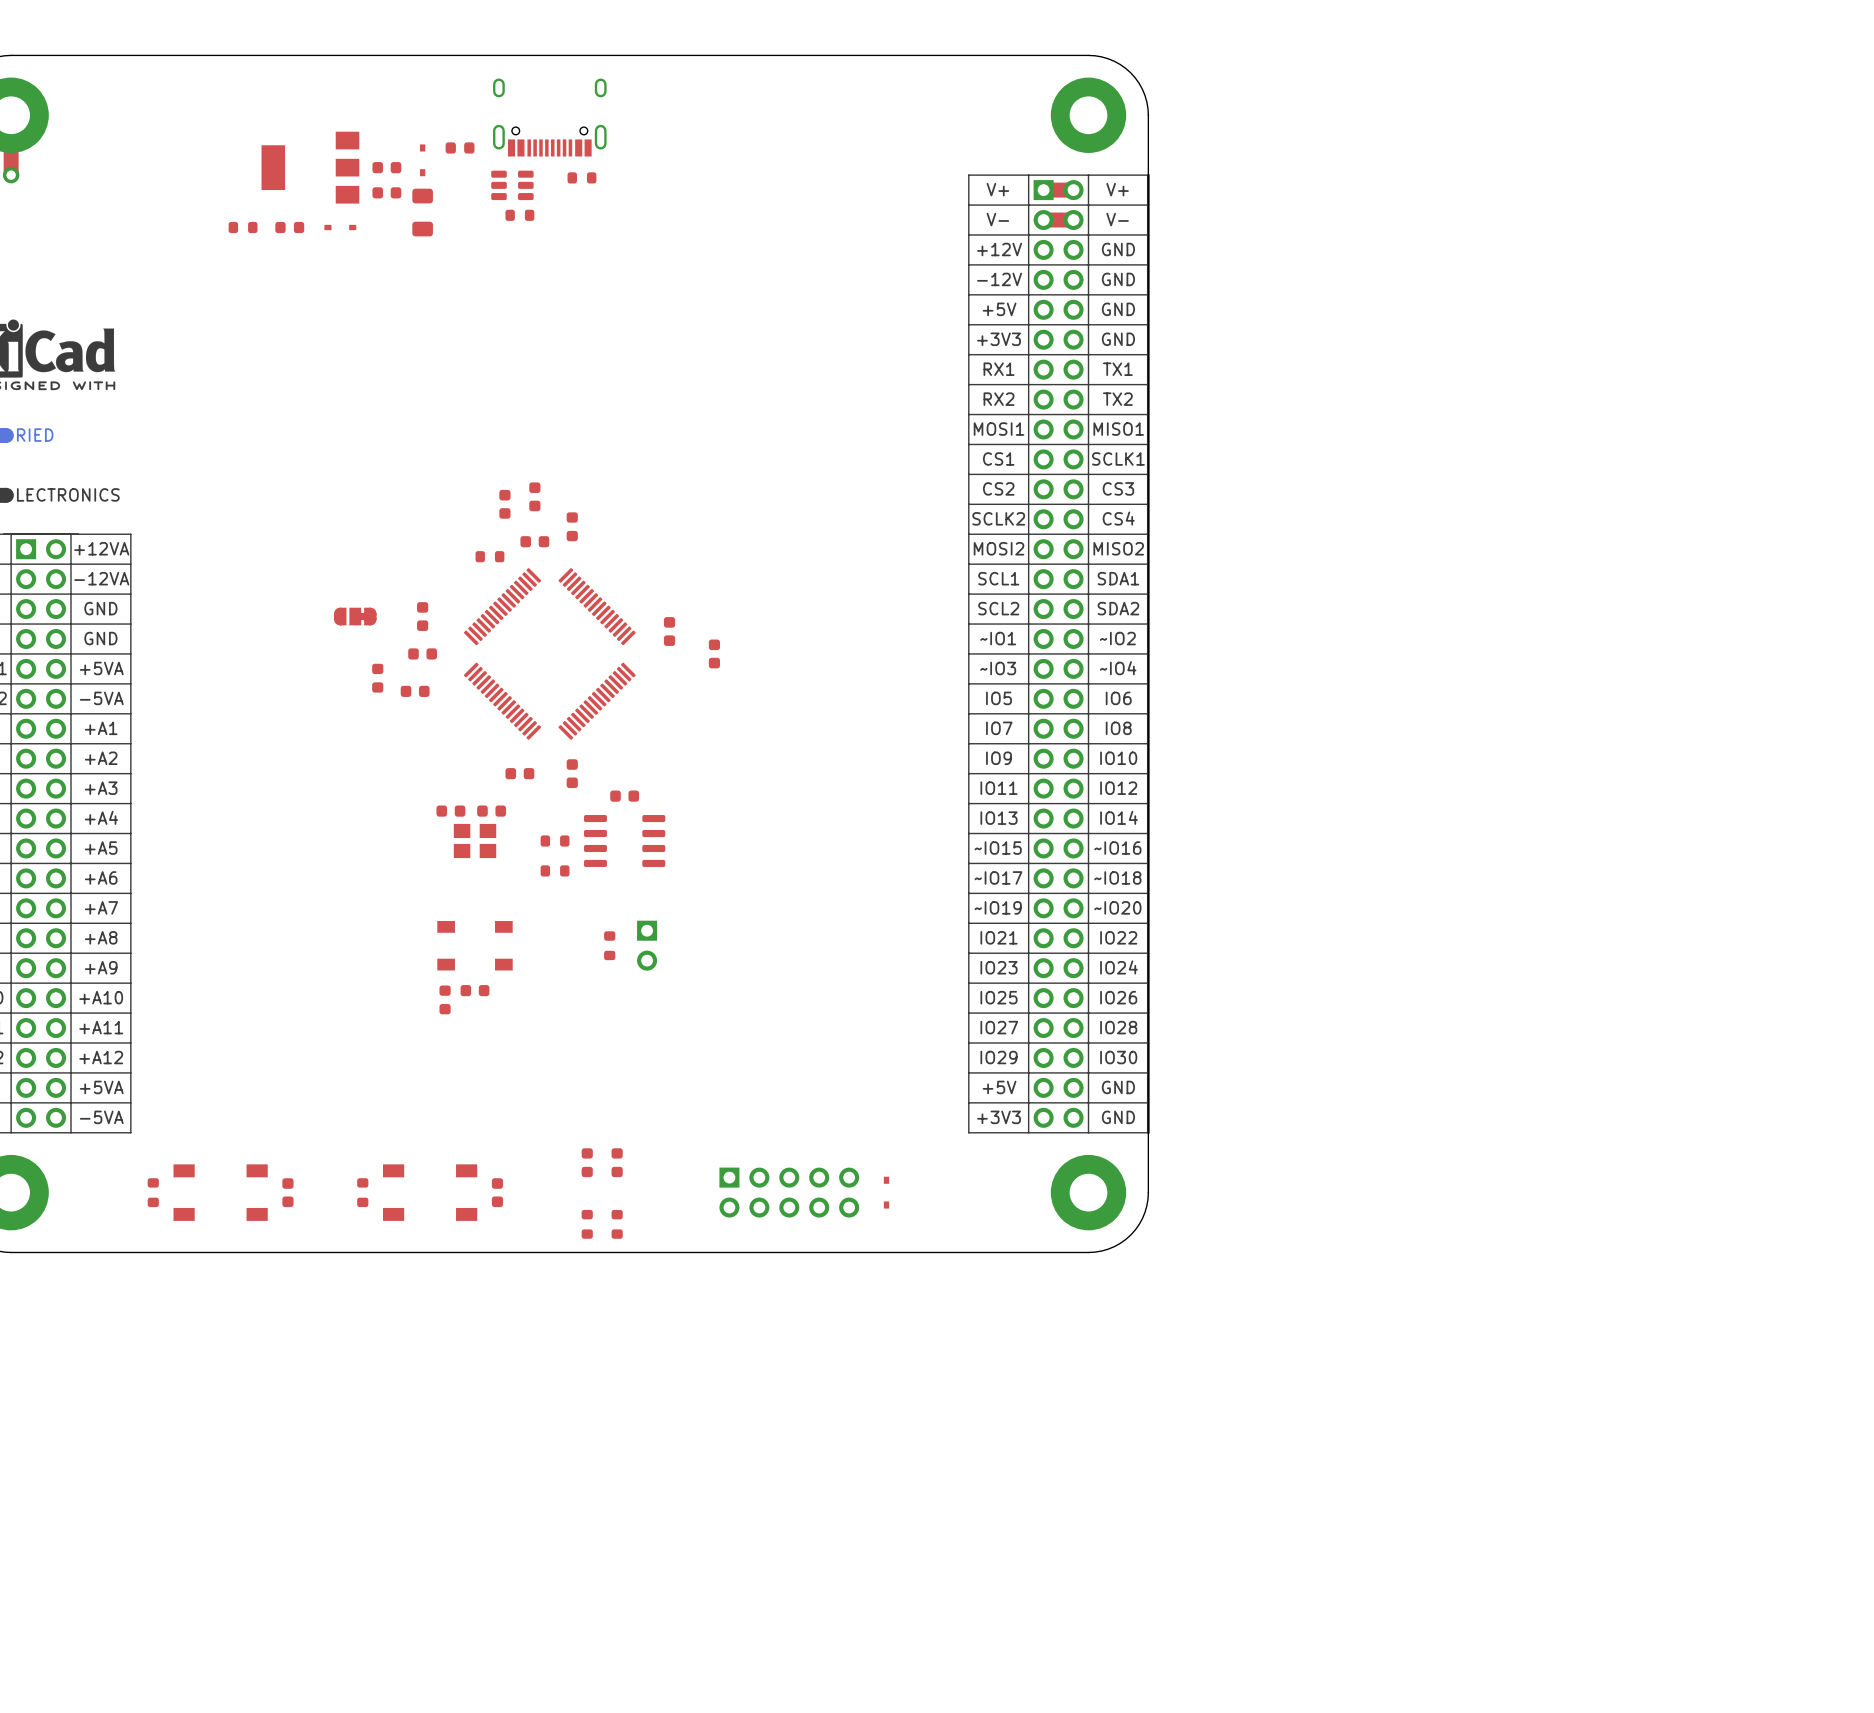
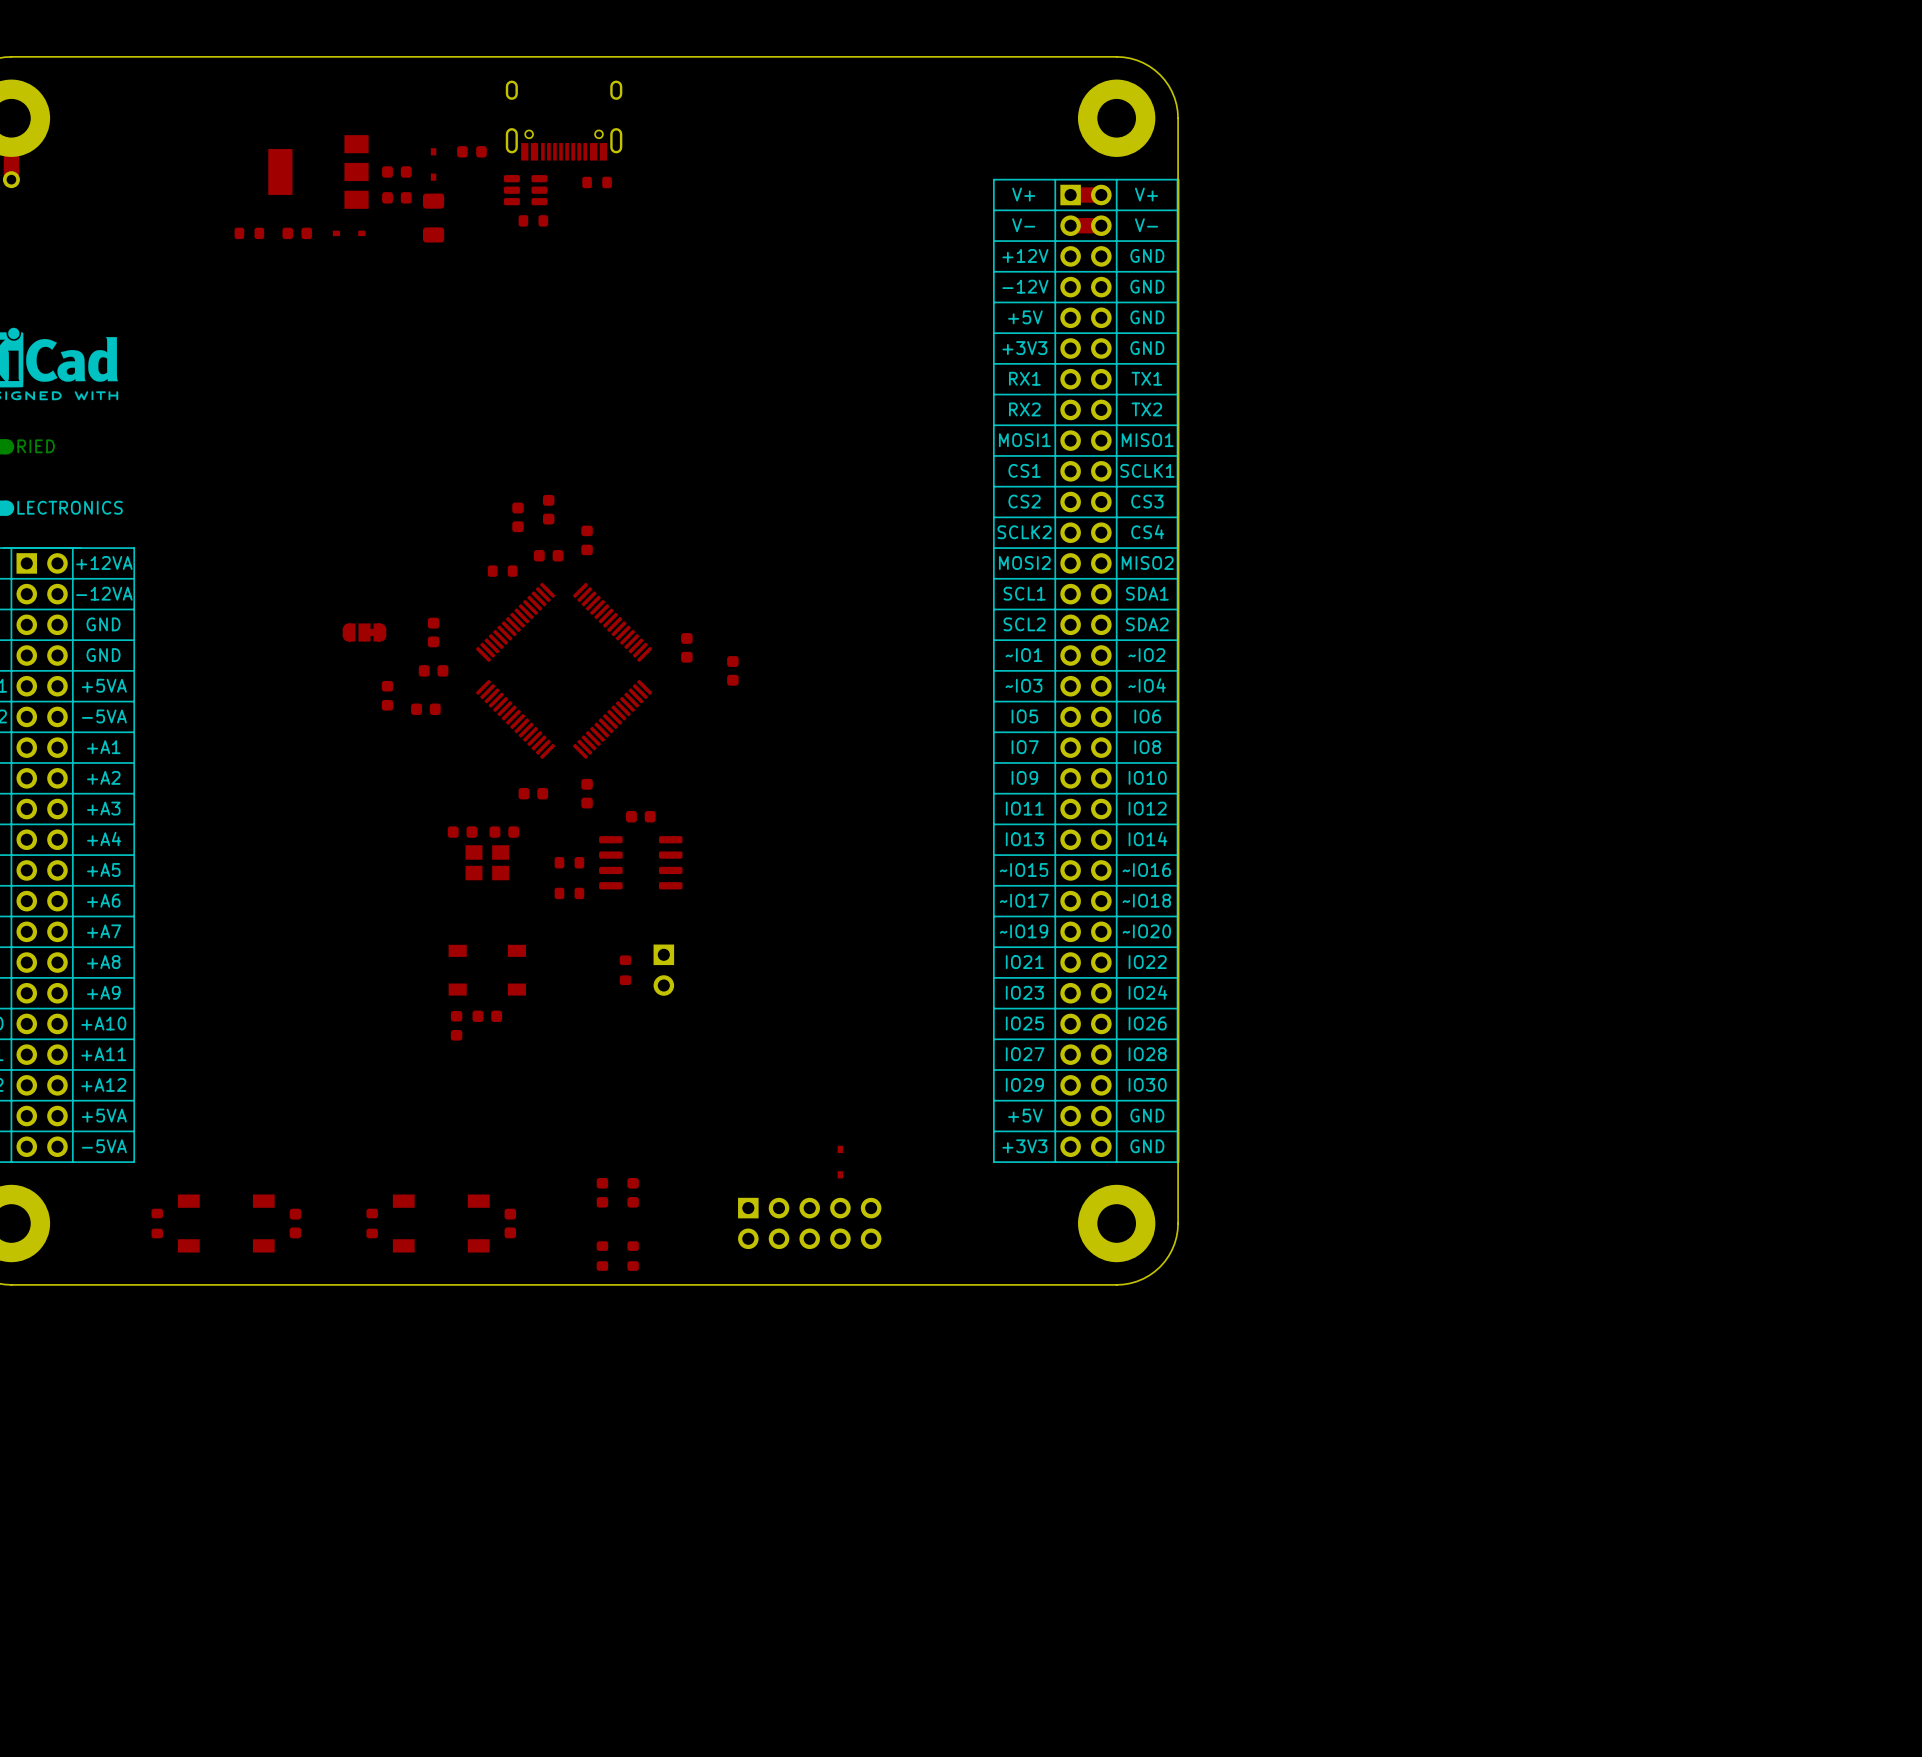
part position: (886, 1192) -> (840, 1162)

